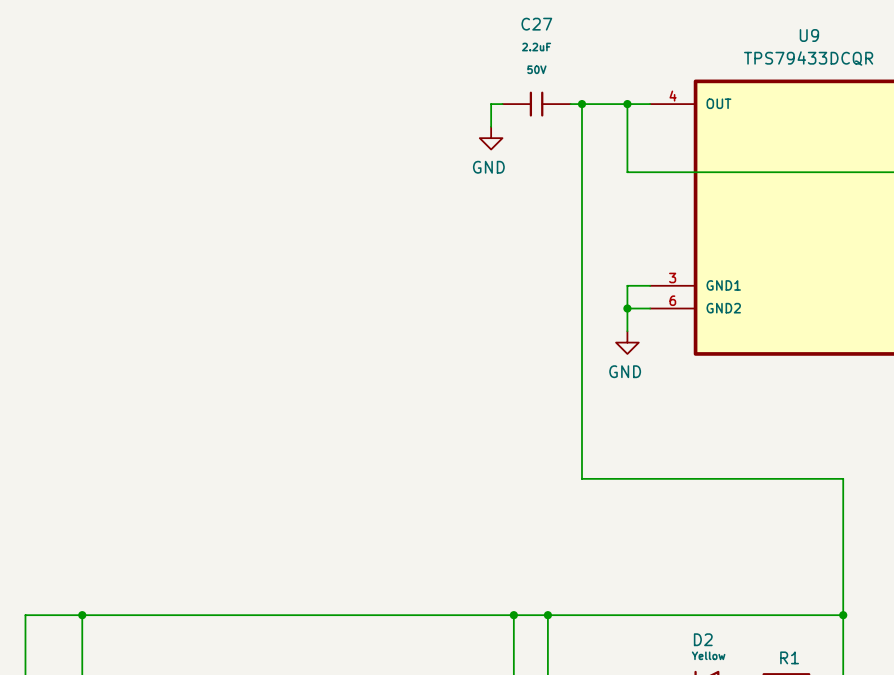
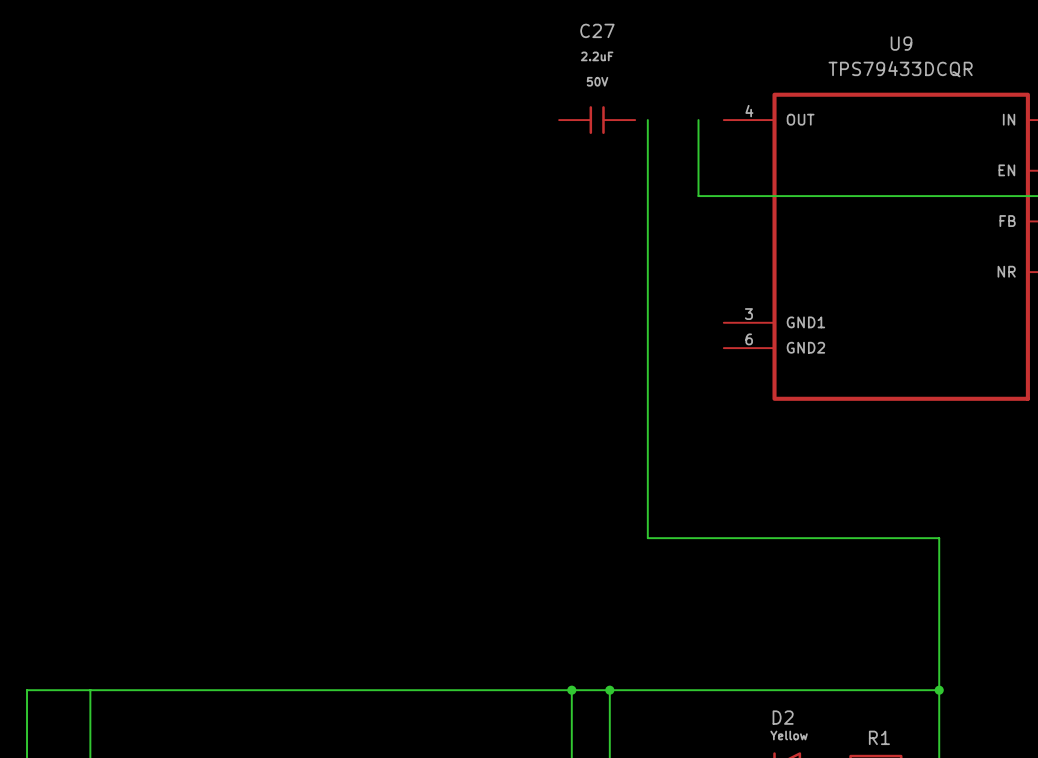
wire: (502, 104) (491, 104) (491, 126) -> none
wire: (570, 104) (650, 104) -> none
junction: (581, 104) -> none
junction: (627, 104) -> none
power symbol: GND (491, 138) -> none
wire: (650, 285) (627, 285) (627, 331) -> none
wire: (627, 308) (650, 308) -> none
junction: (627, 308) -> none
power symbol: GND (627, 342) -> none
junction: (82, 615) -> none

